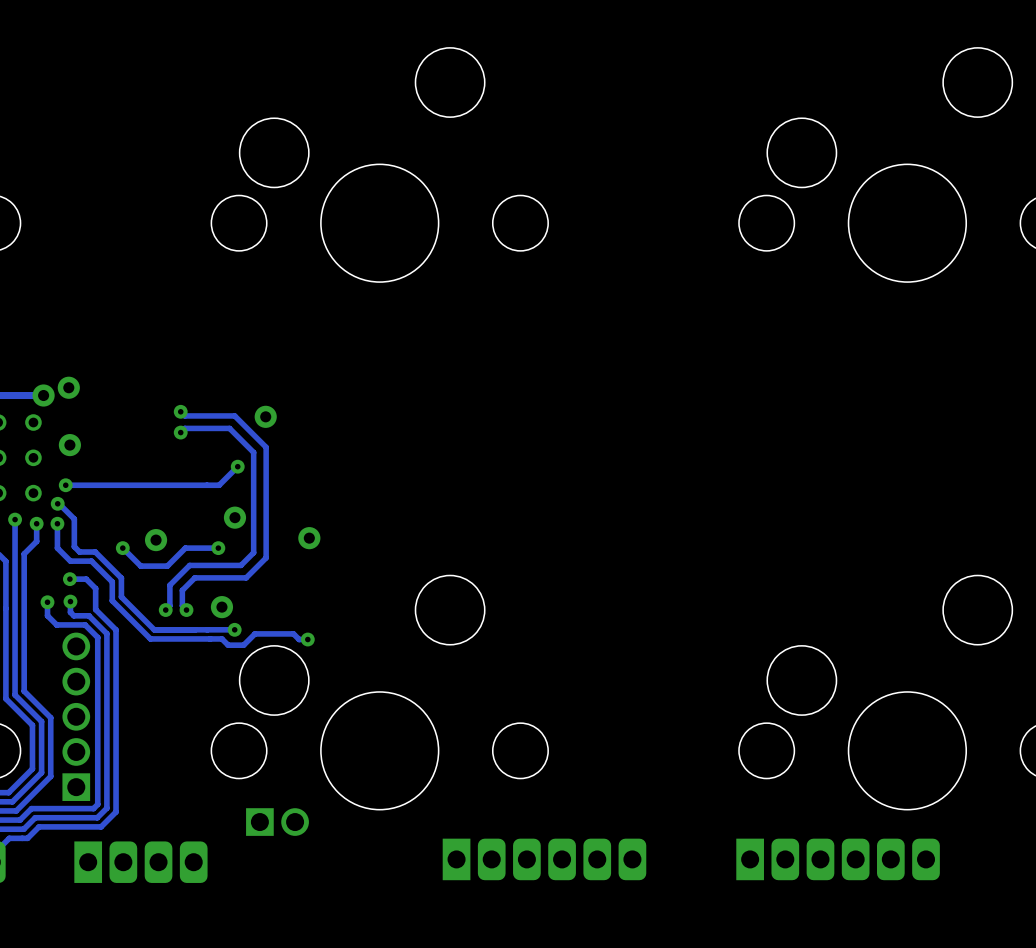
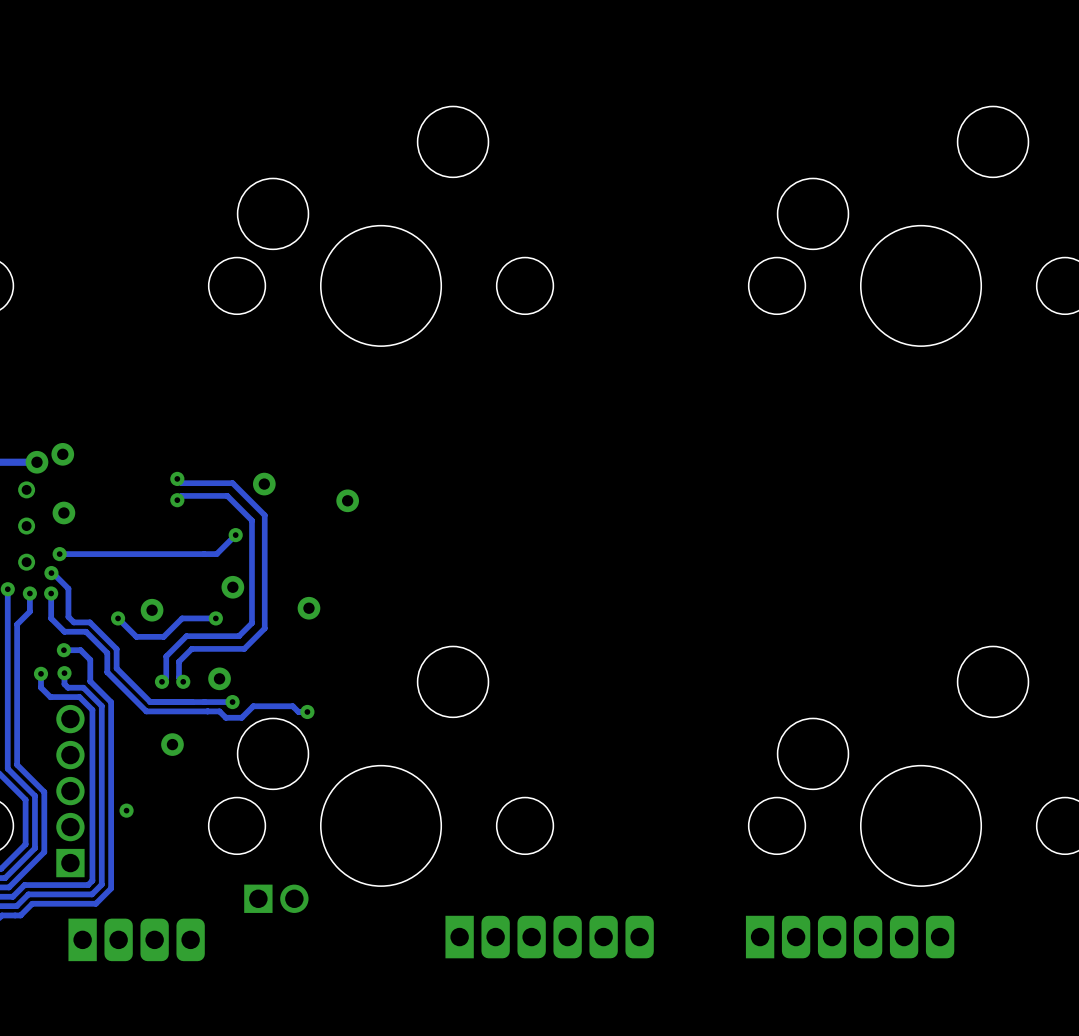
via: none -> (347, 500)
via: none -> (172, 744)
via: none -> (126, 810)

